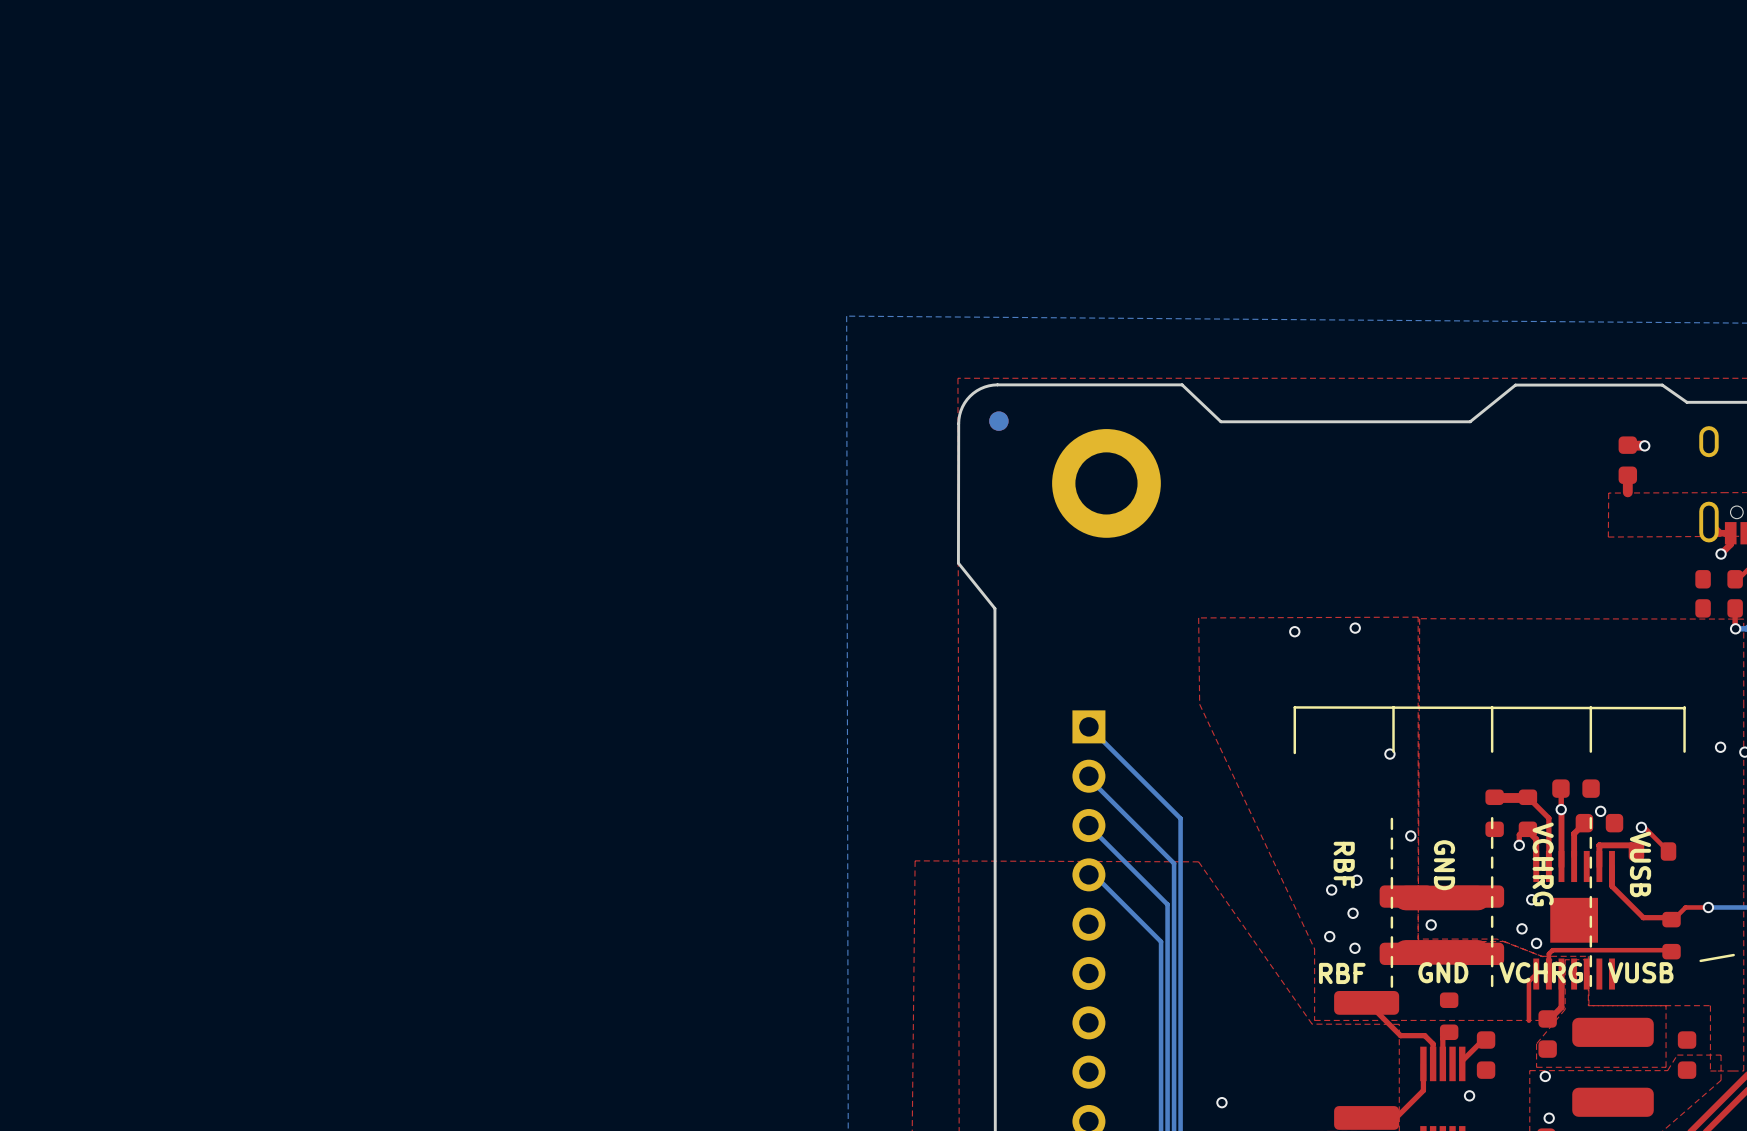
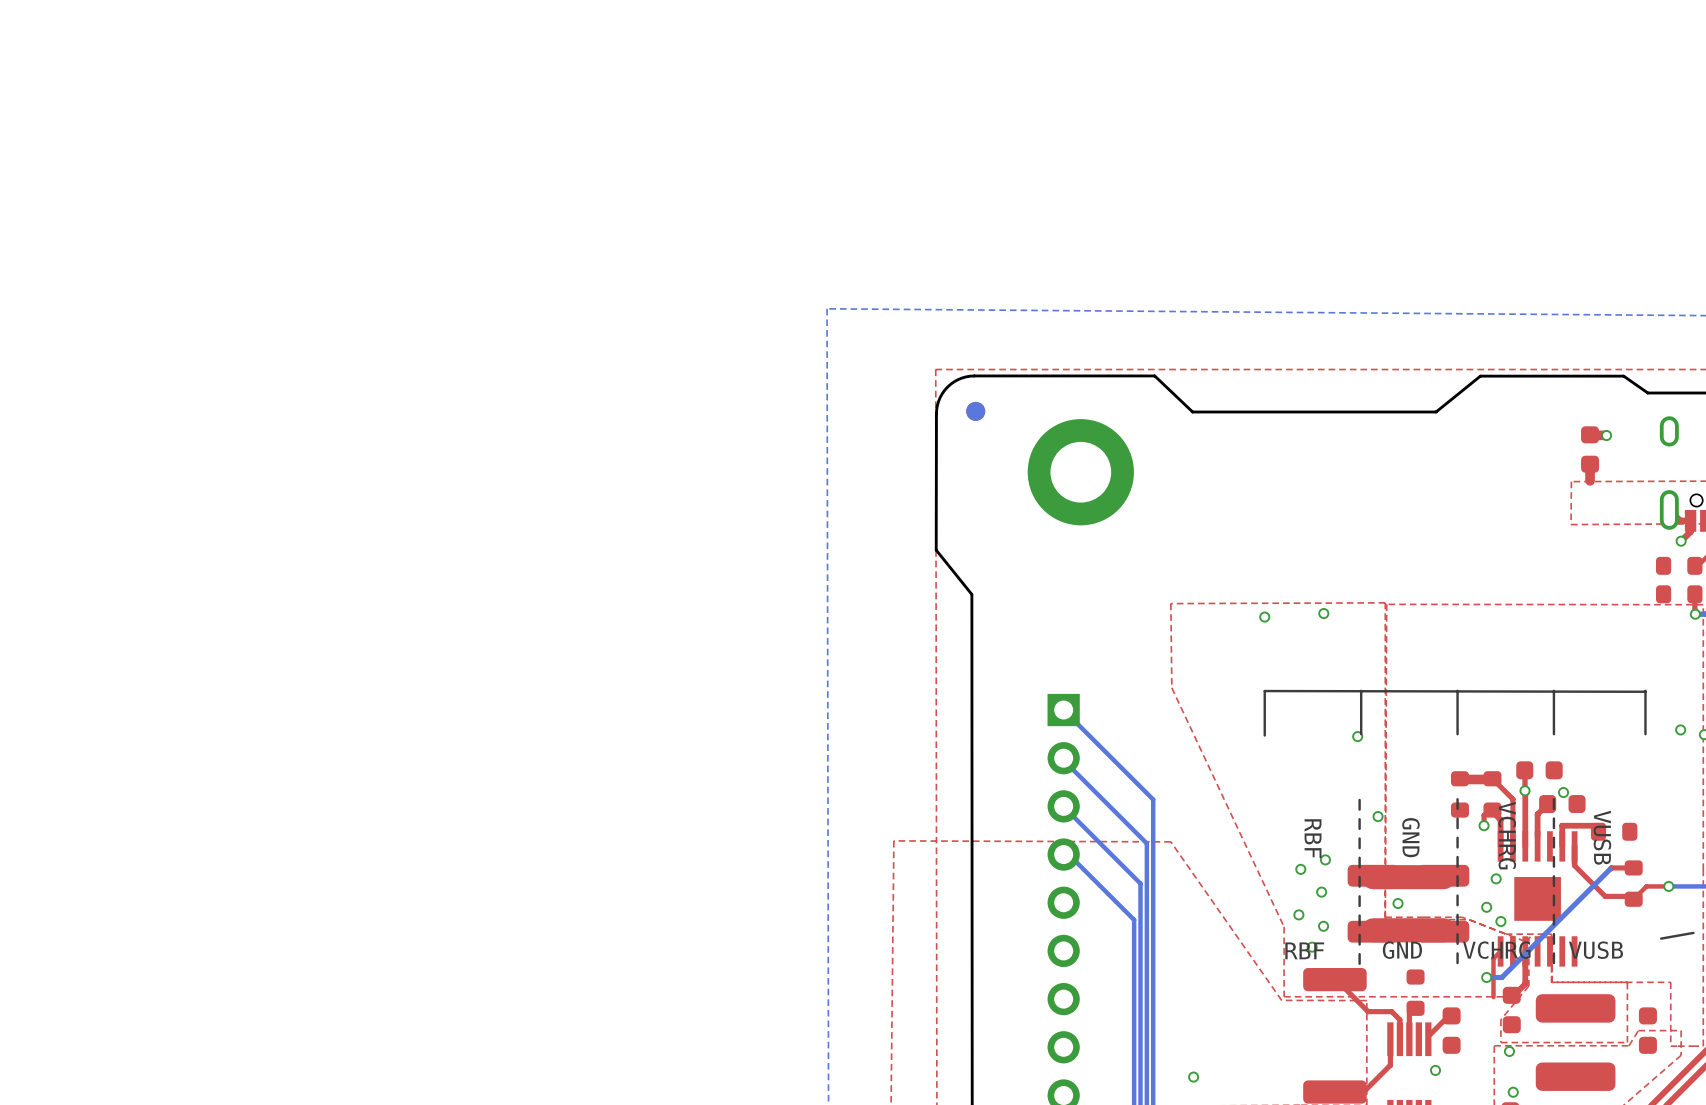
top track: (1639, 827) (1644, 827) (1668, 851) -> none
via: (1641, 827) -> none
top track: none -> (1633, 867) (1609, 869)
bottom track: none -> (1609, 869) (1501, 977) (1486, 977)
part position: (1671, 935) -> (1633, 883)
top track: (1671, 951) (1552, 950) (1548, 953) (1548, 974) -> none
via: none -> (1486, 977)

